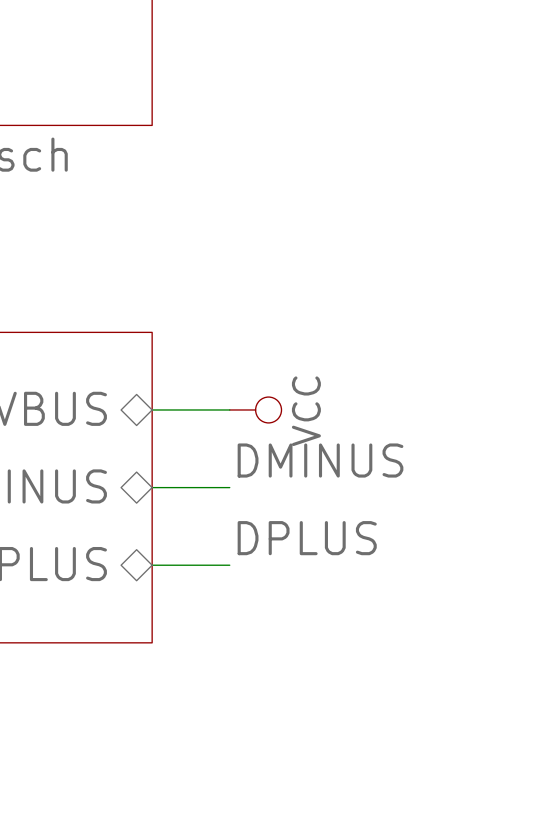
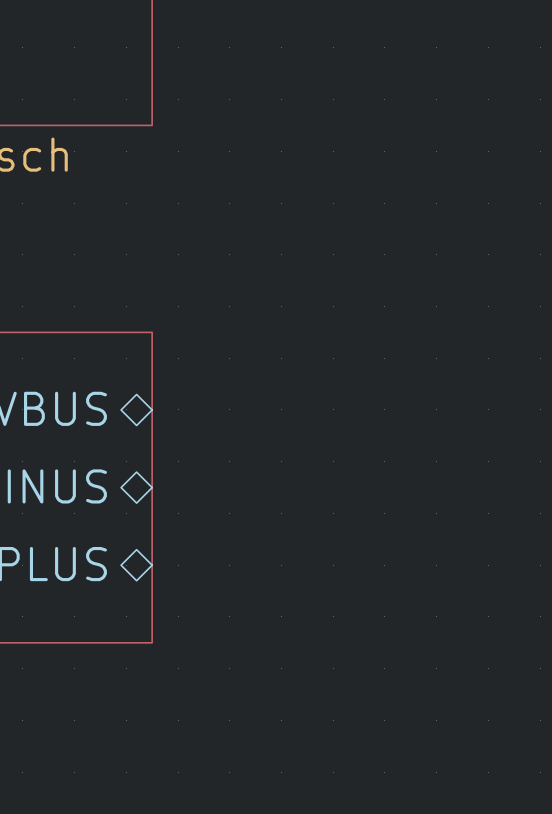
wire: (152, 409) (229, 409) -> none
power symbol: VCC (255, 409) -> none
label: DMINUS (320, 460) -> none
wire: (152, 487) (229, 487) -> none
label: DPLUS (307, 538) -> none
wire: (152, 565) (229, 565) -> none

